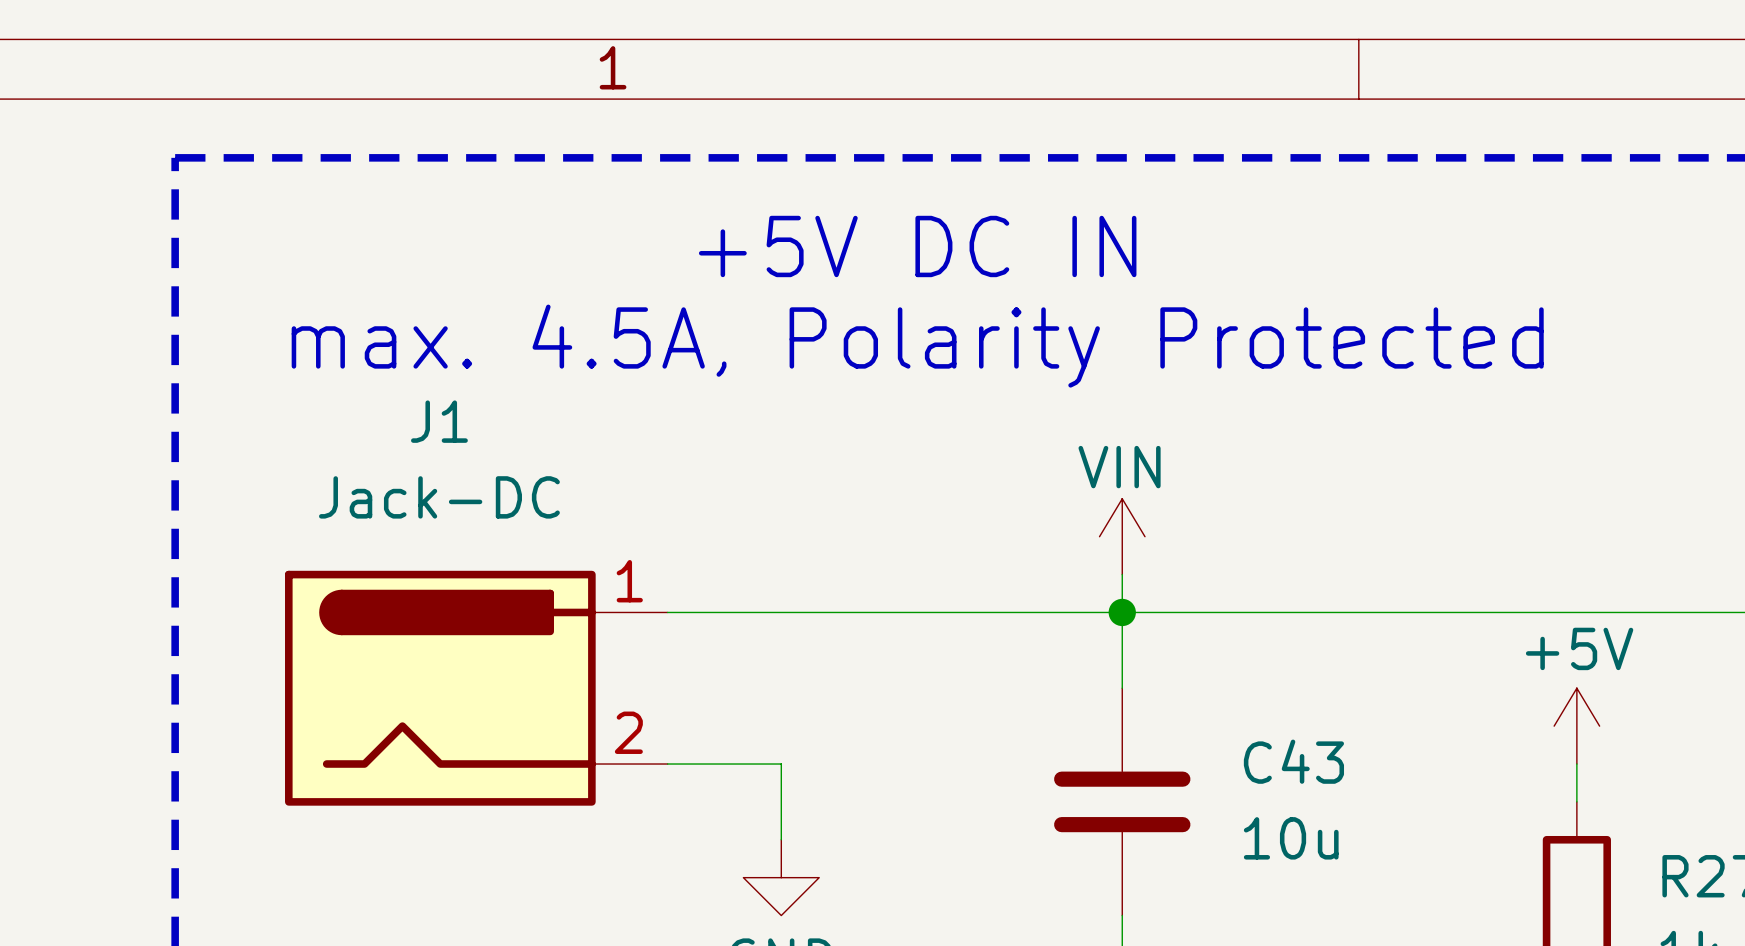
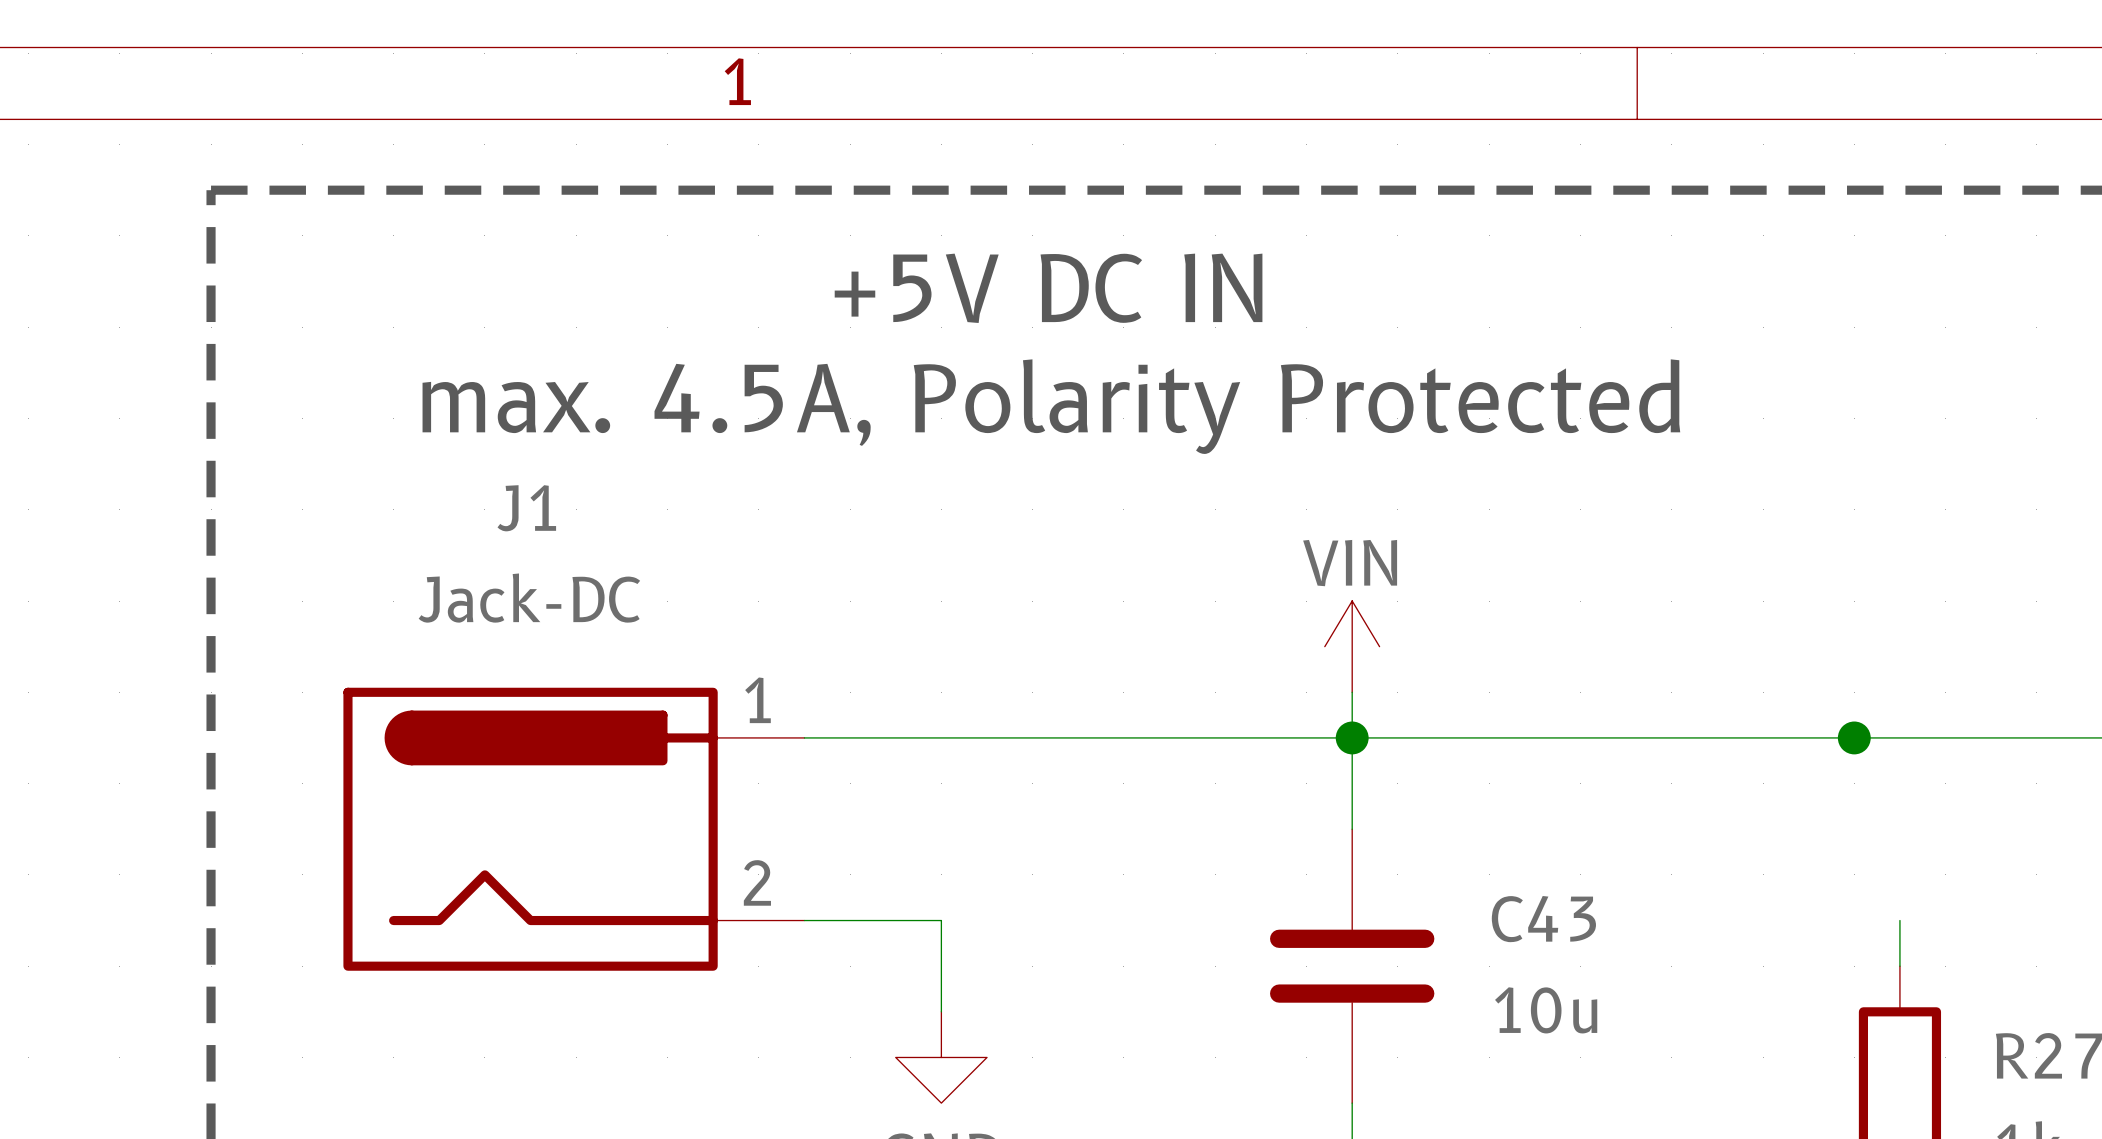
text position: +5V DC IN (917, 246) -> +5V DC IN (1048, 288)
text position: max. 4.5A, Polarity Protected (917, 346) -> max. 4.5A, Polarity Protected (1051, 406)
junction: none -> (1854, 737)
power symbol: +5V (1576, 726) -> none

